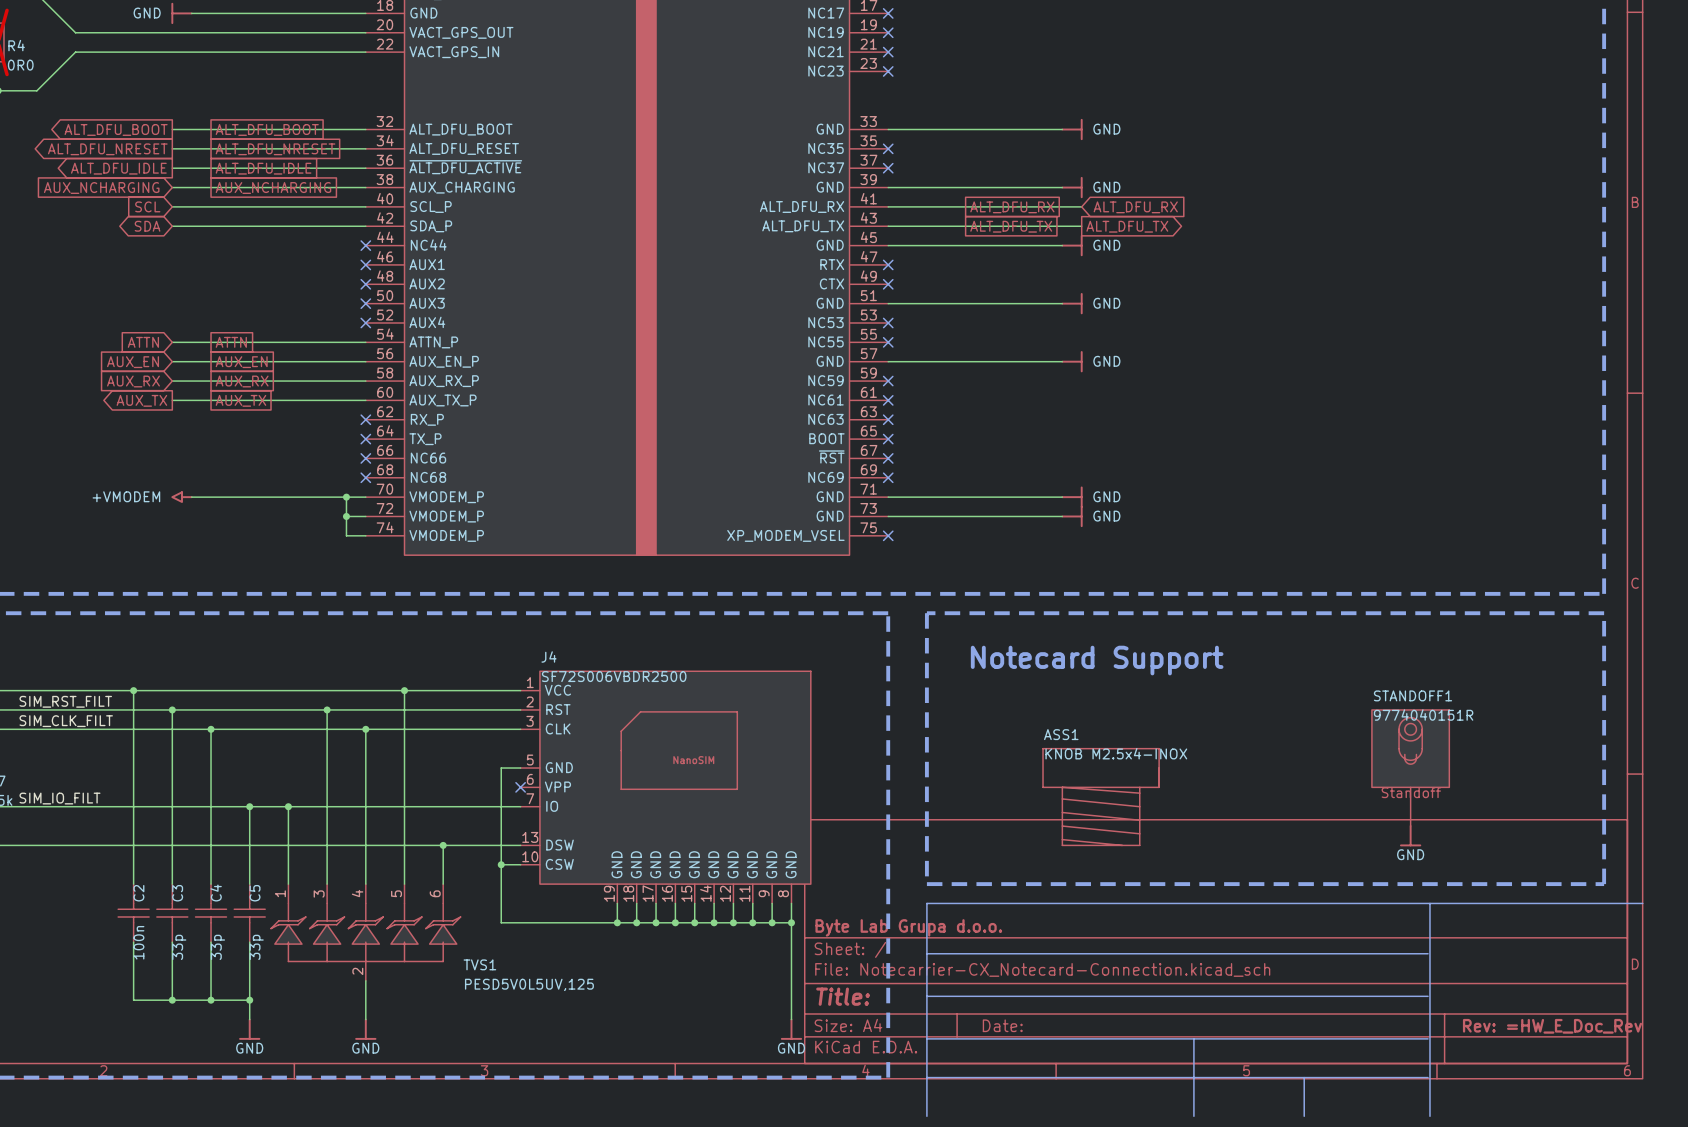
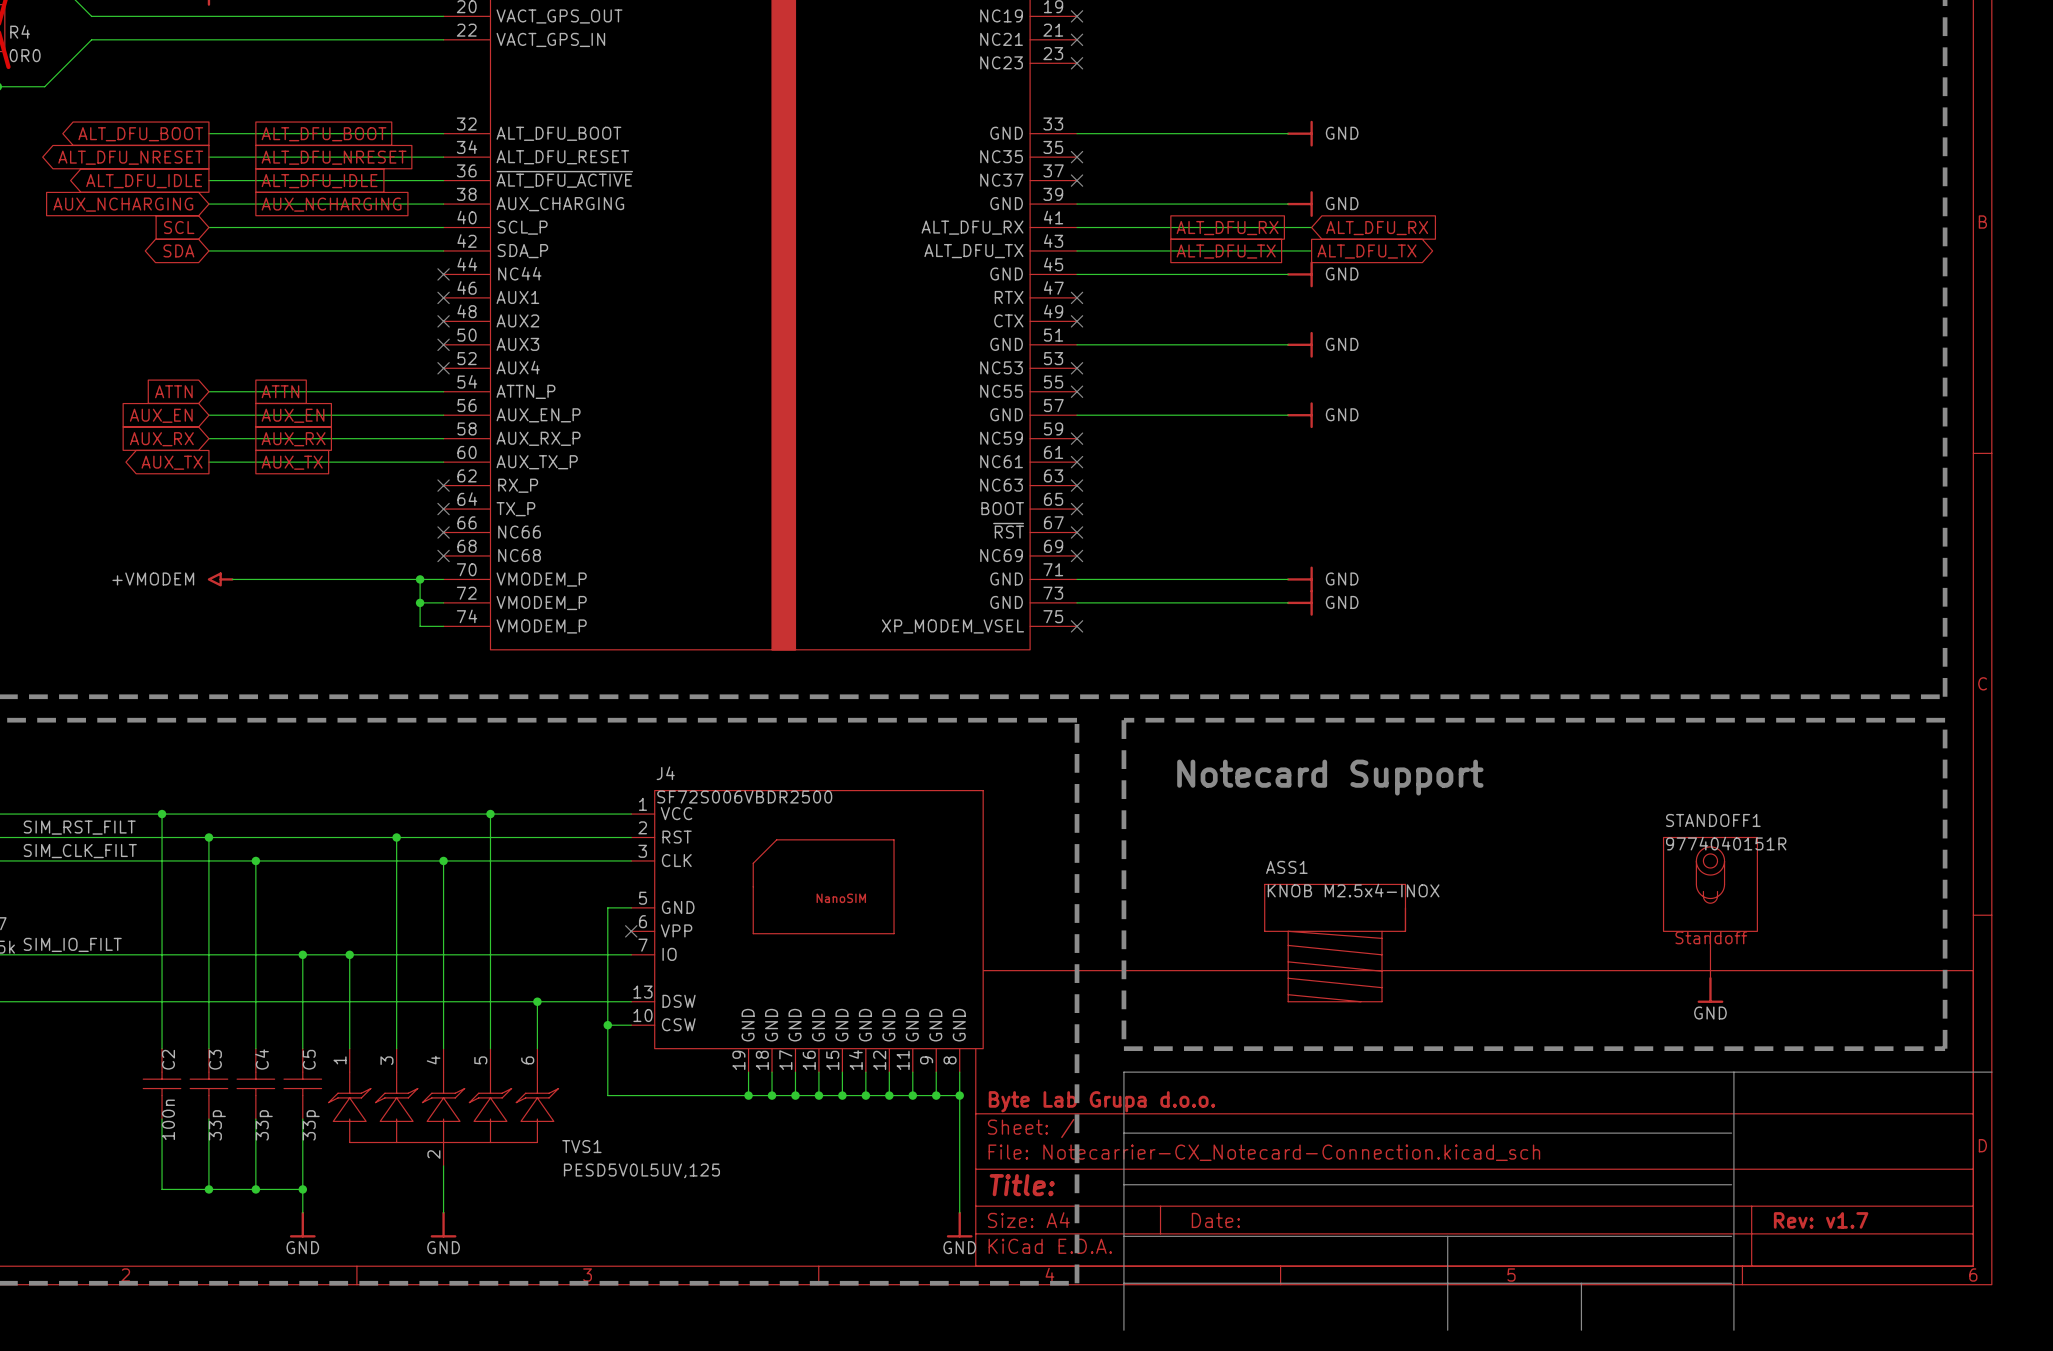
title block: Rev: =HW_E_Doc_Rev (1552, 1026) -> Rev: v1.7 (1821, 1220)

